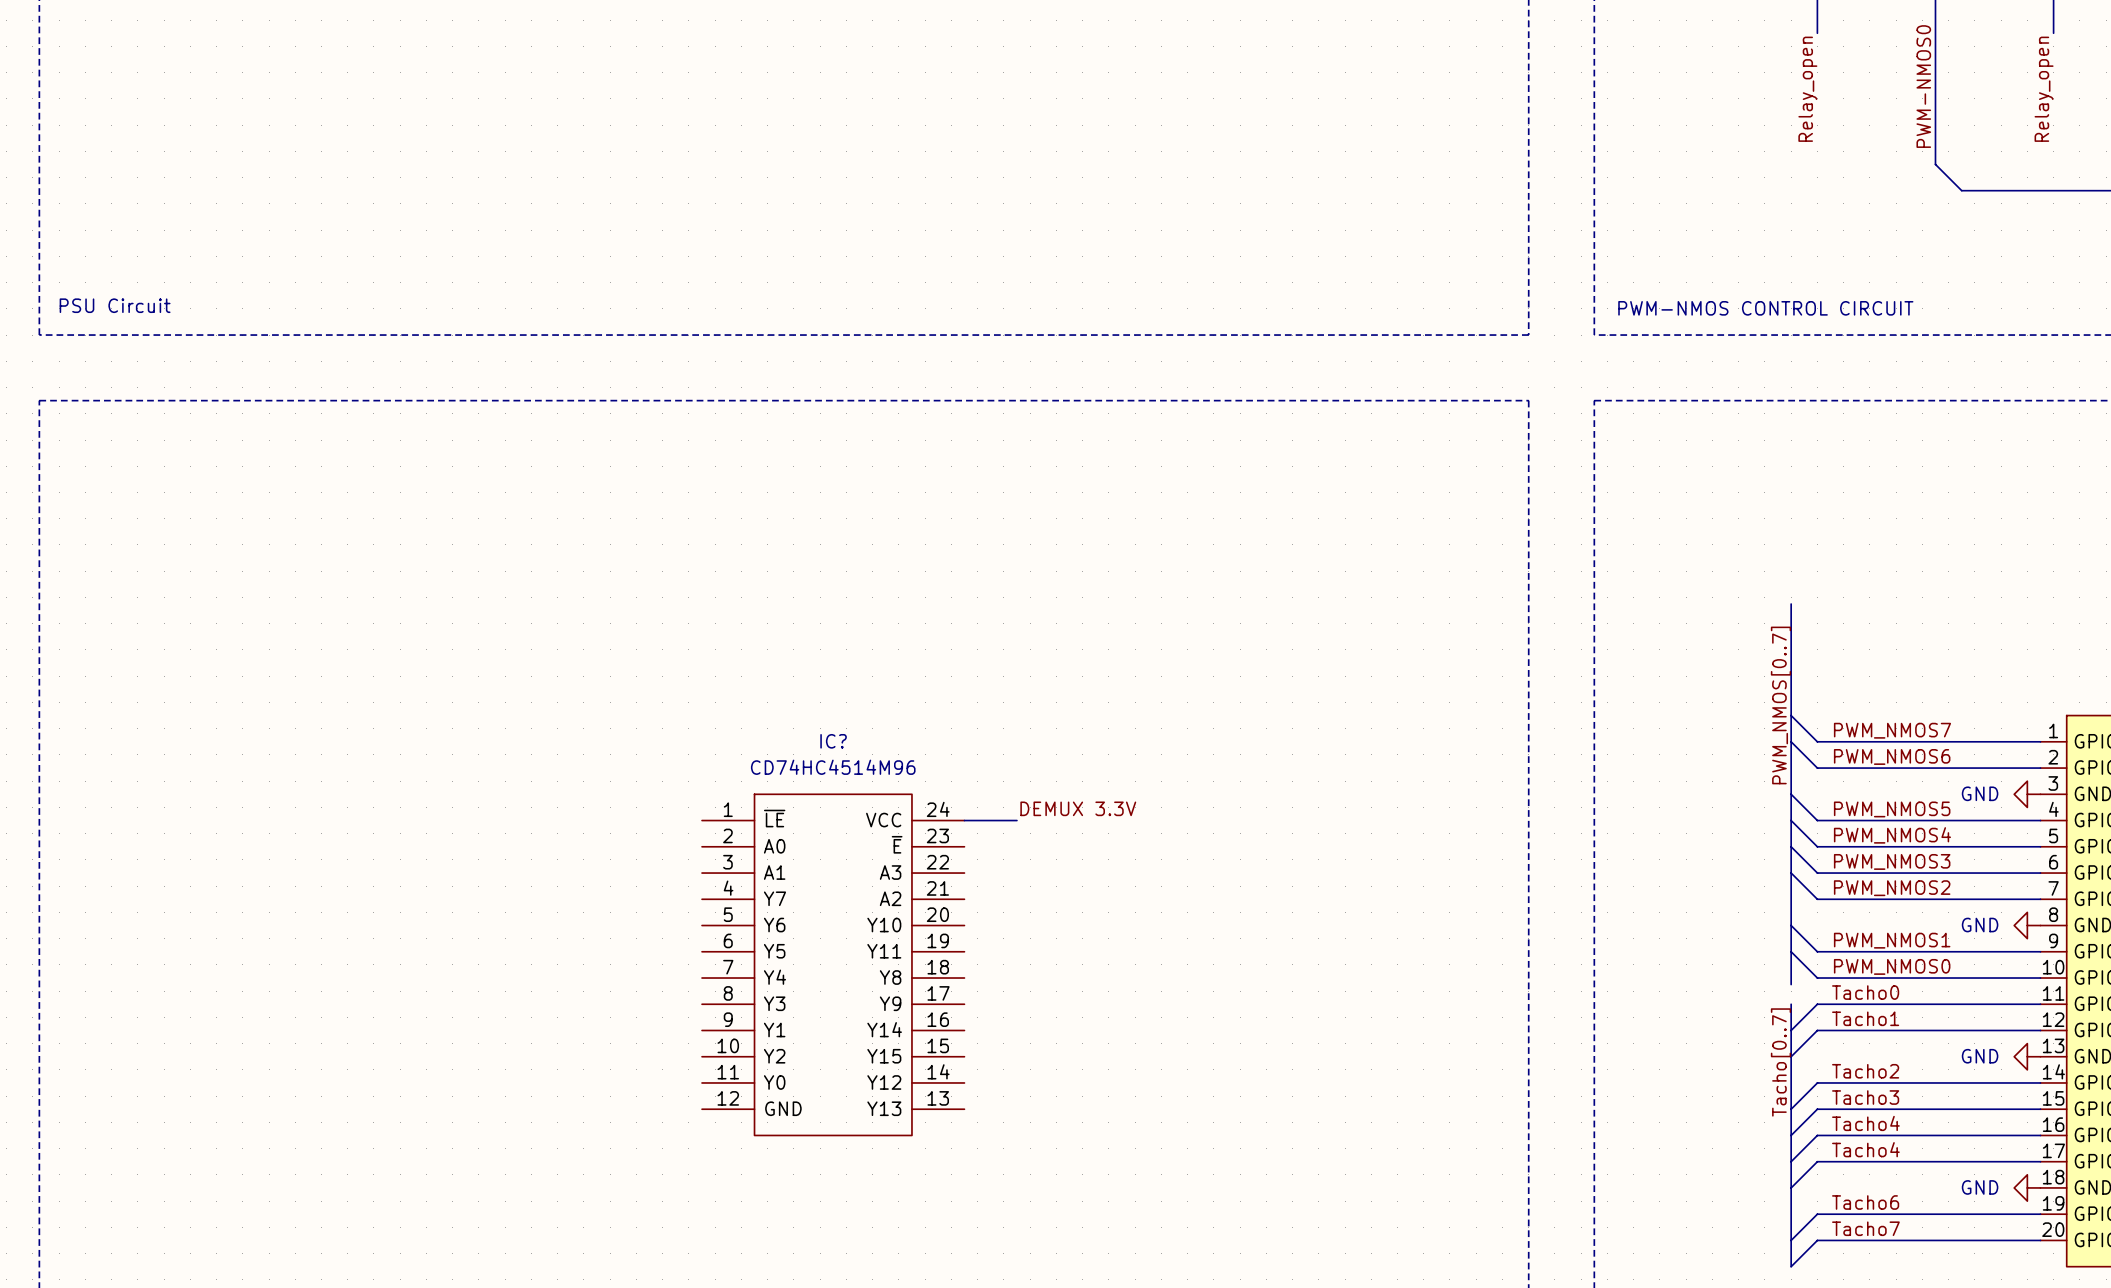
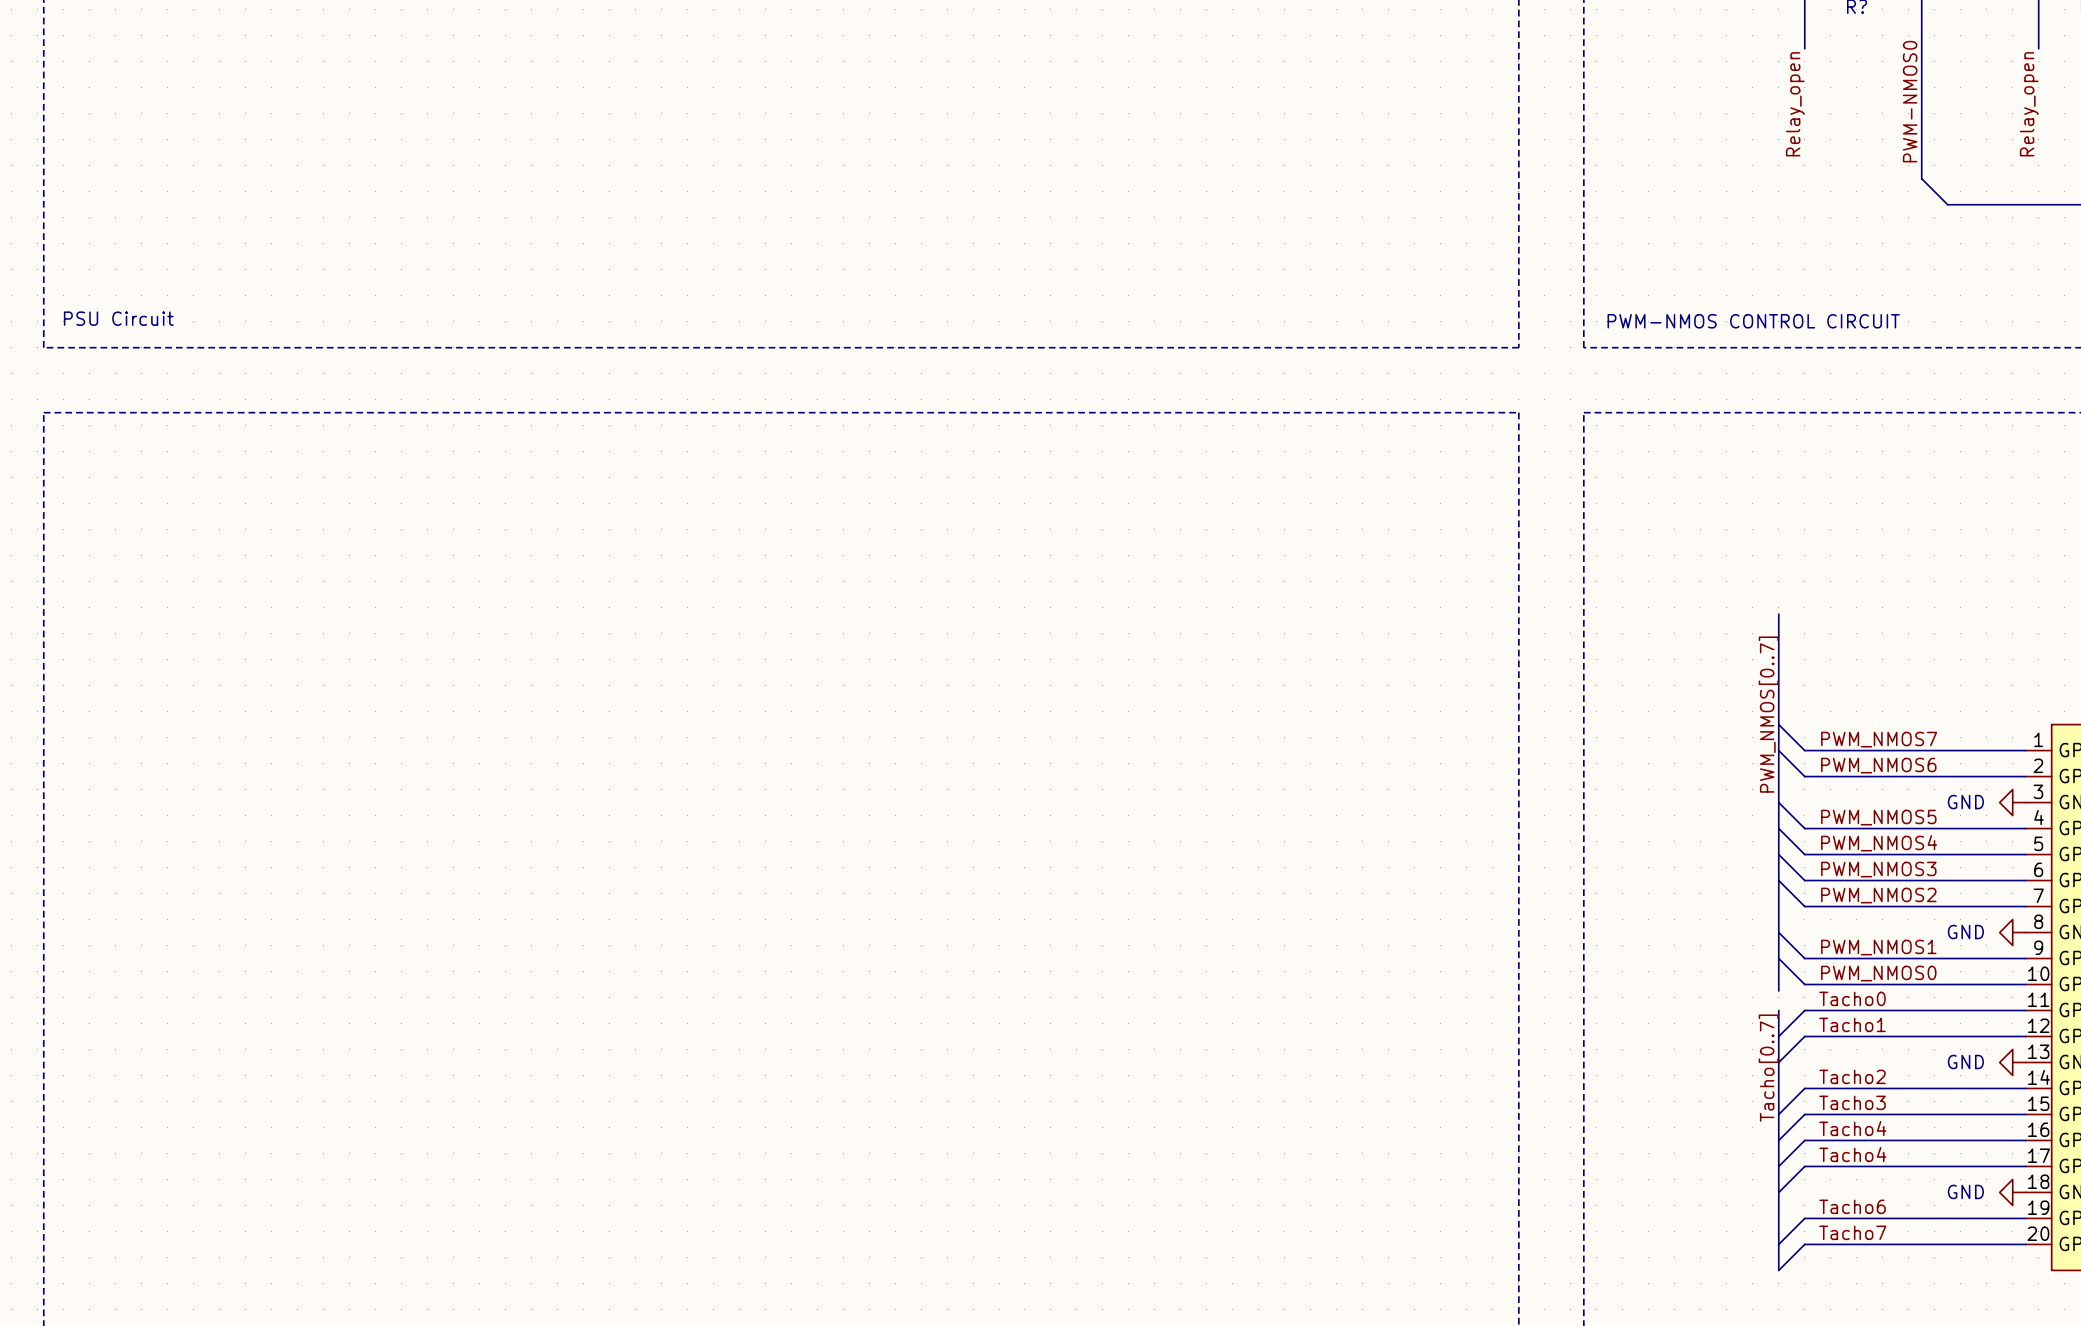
label: DEMUX 3.3V (1078, 808) -> none
wire: (964, 820) (1016, 820) -> none
IC?: CD74HC4514M96 (833, 964) -> none

